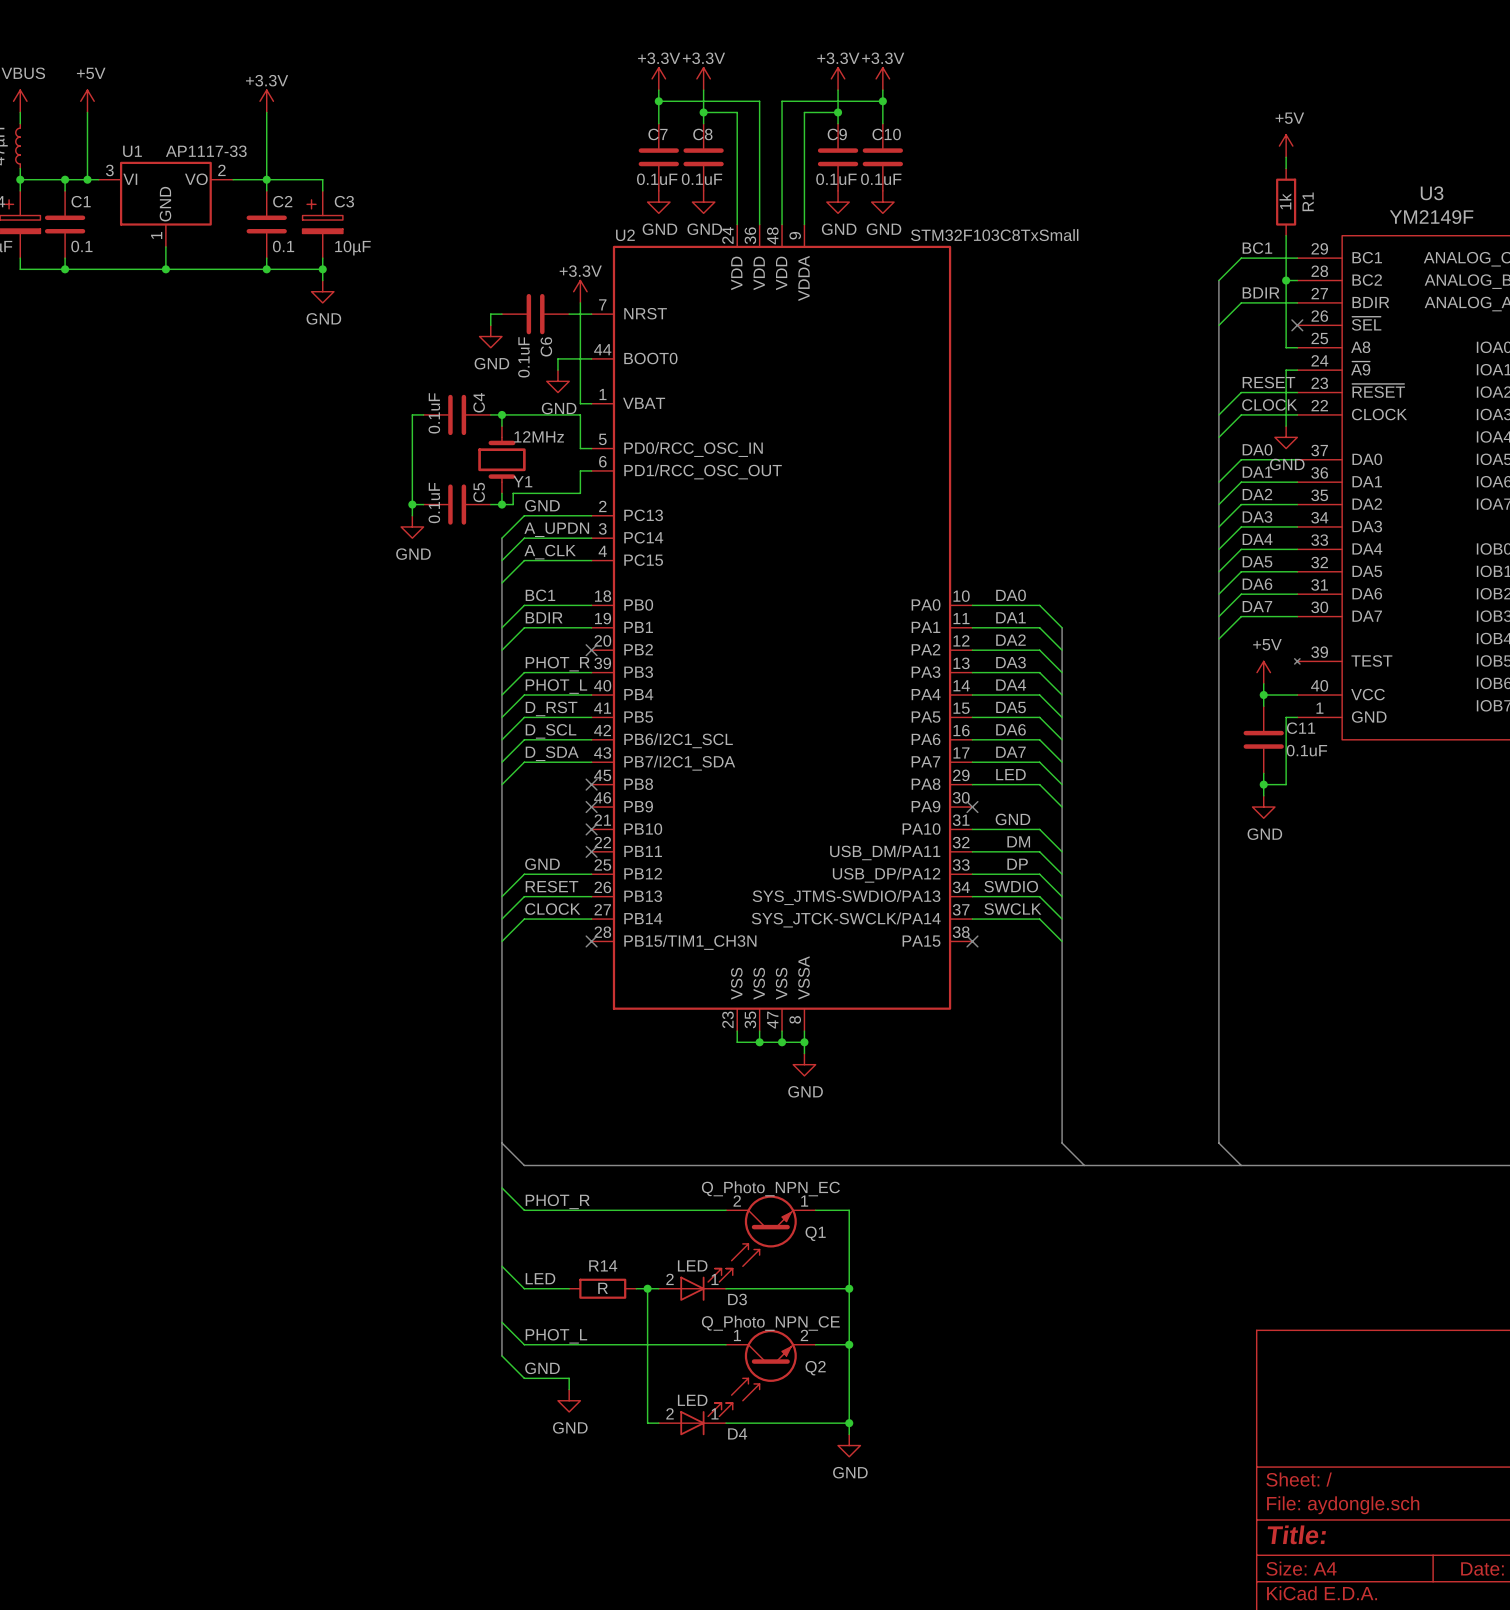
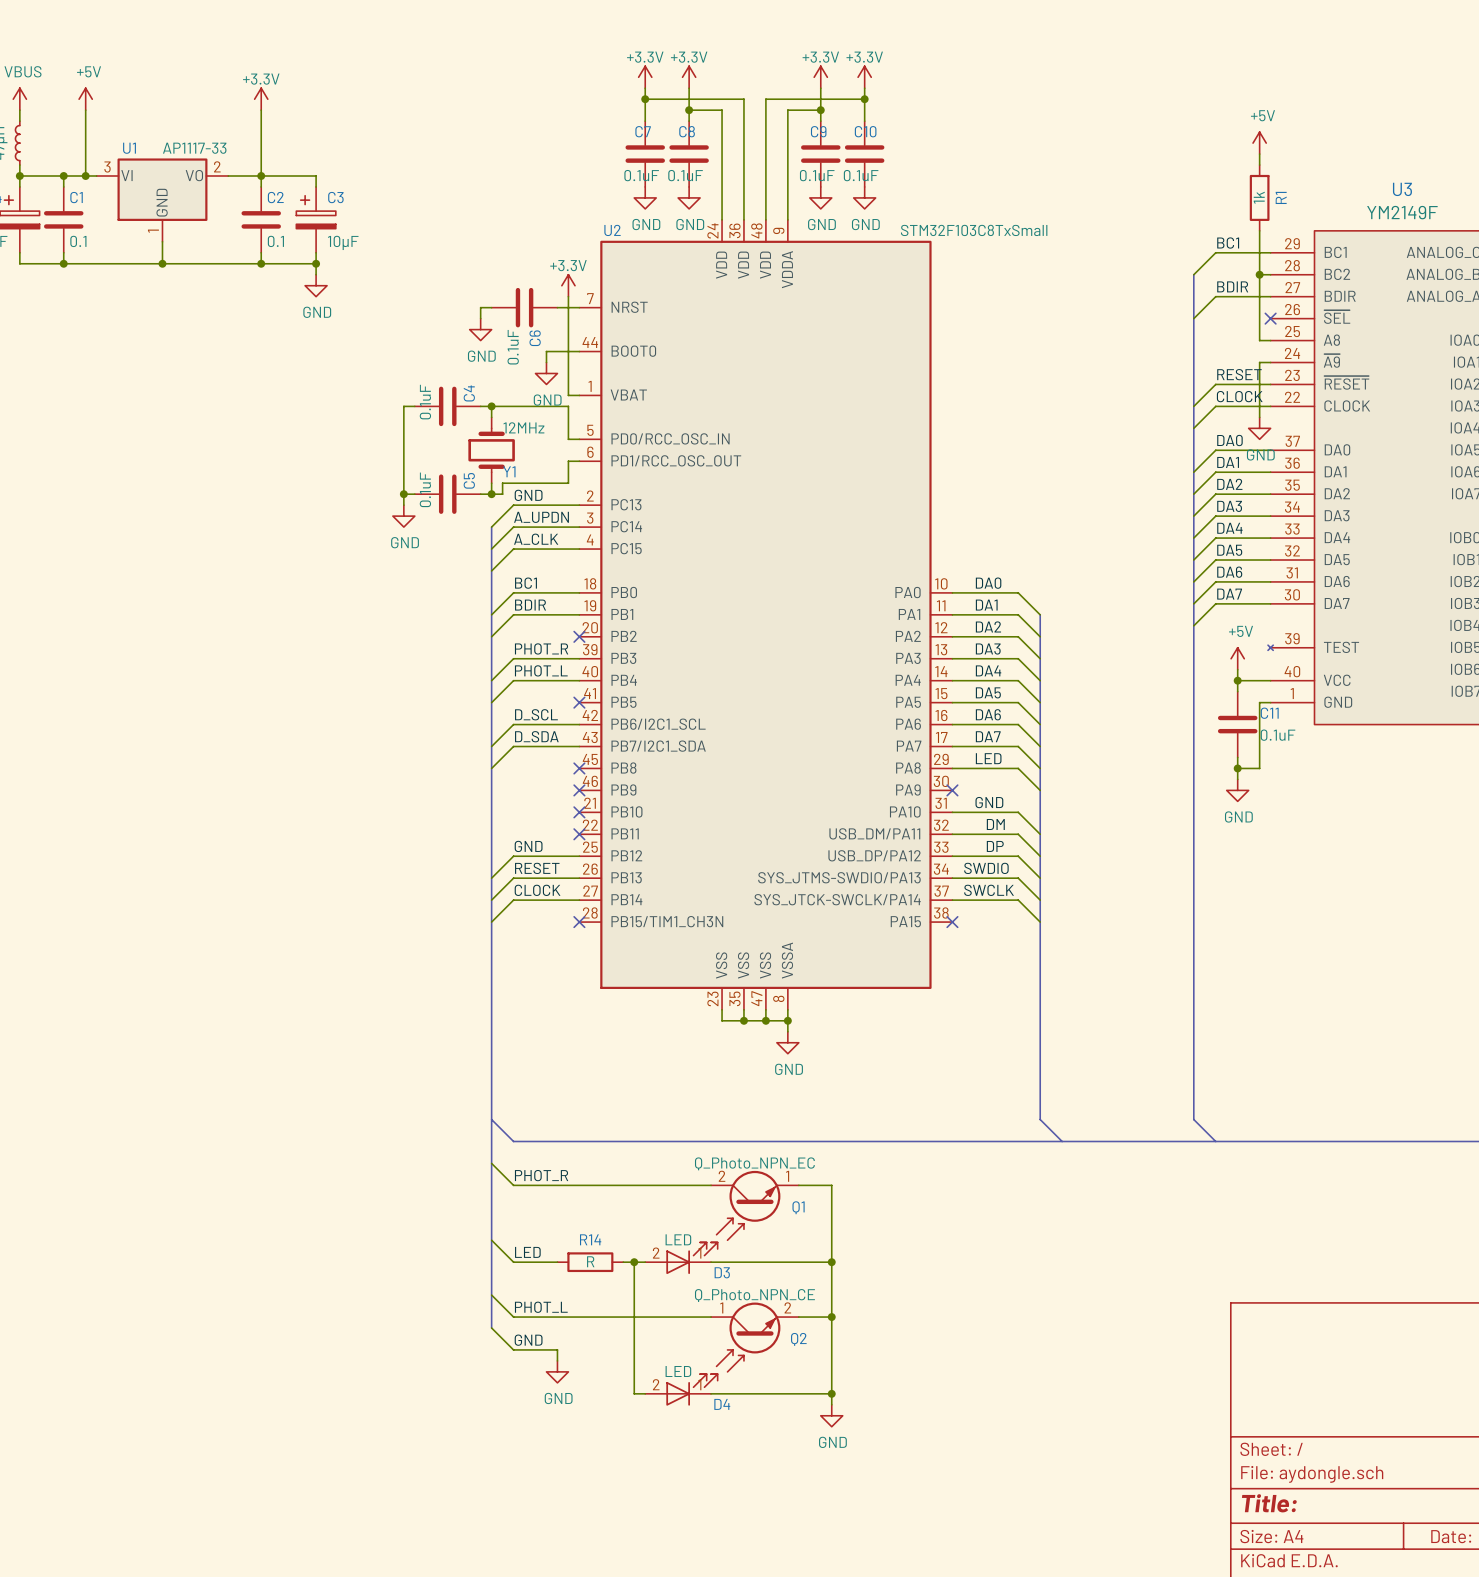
label: D_RST (551, 708) -> none
wire: (591, 717) (524, 717) (501, 739) -> none
no-connect mark: none -> (579, 702)

